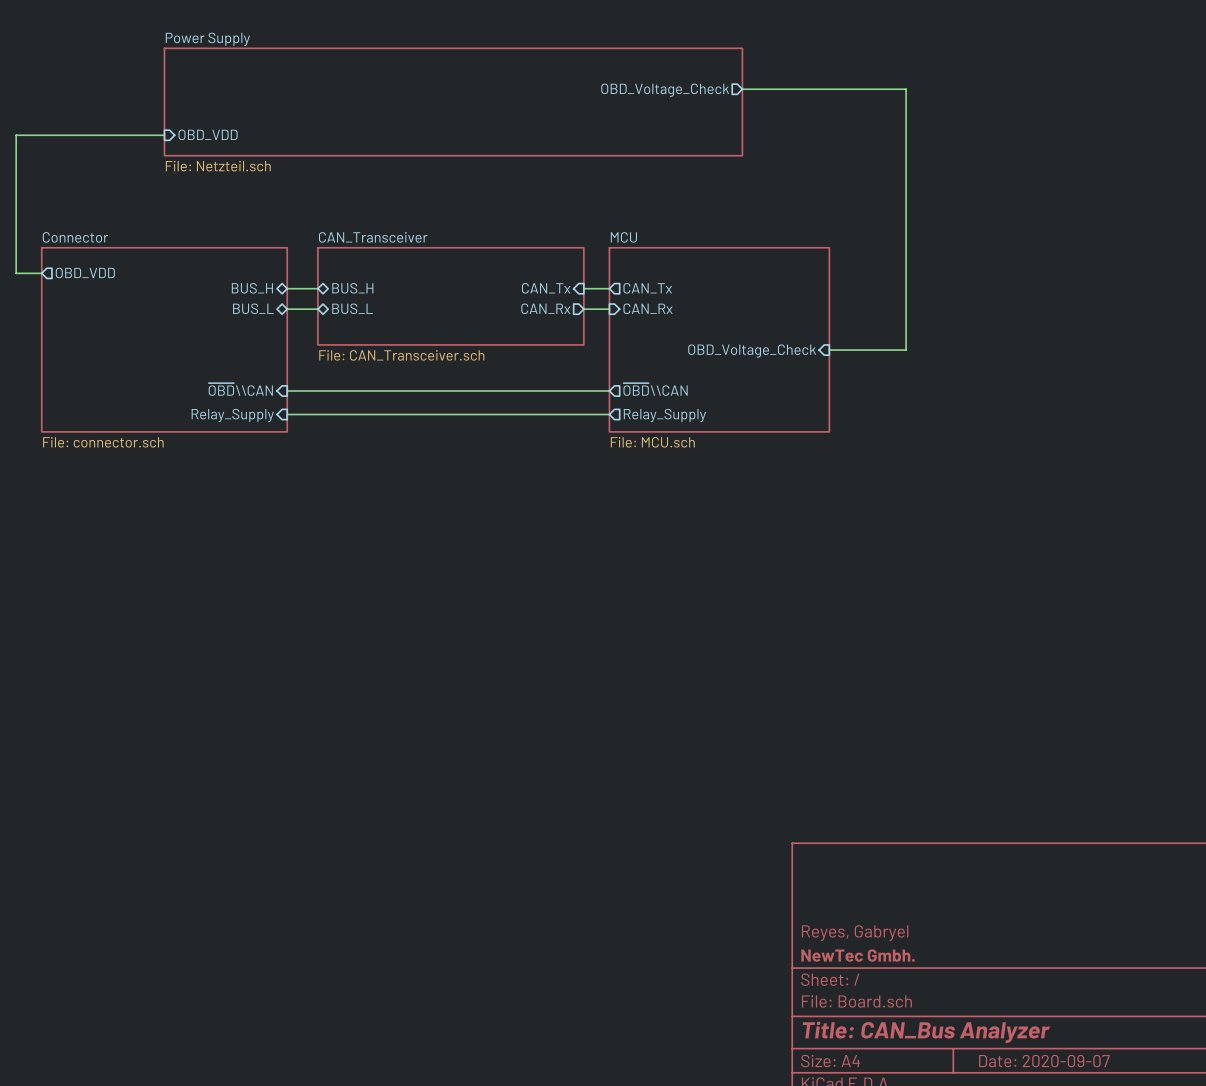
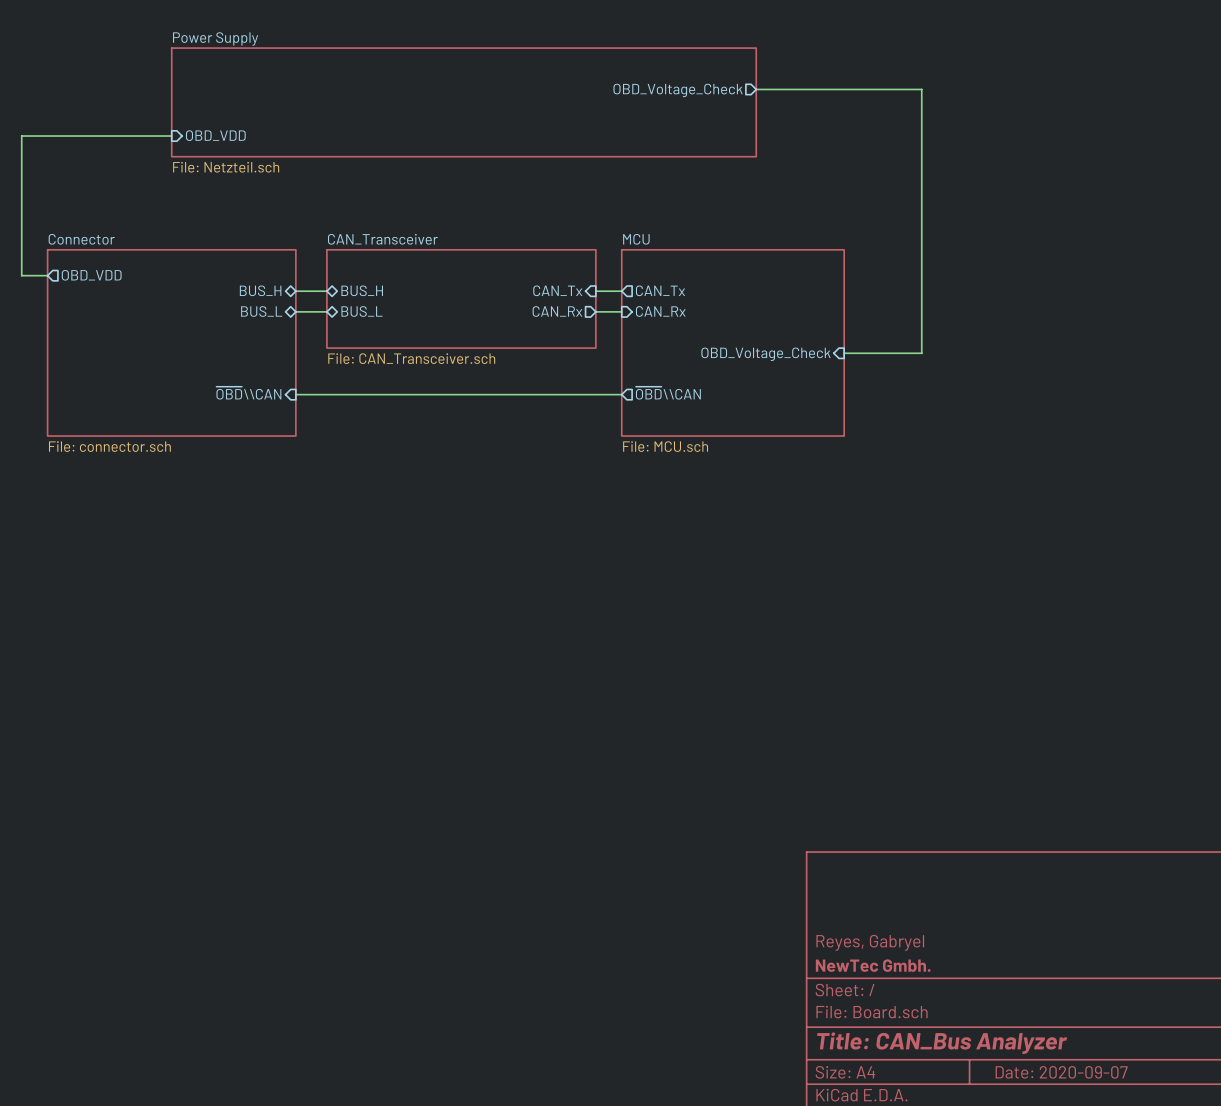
wire: (287, 414) (609, 414) -> none
sheet pin: Relay_Supply (232, 415) -> none
sheet pin: Relay_Supply (664, 415) -> none

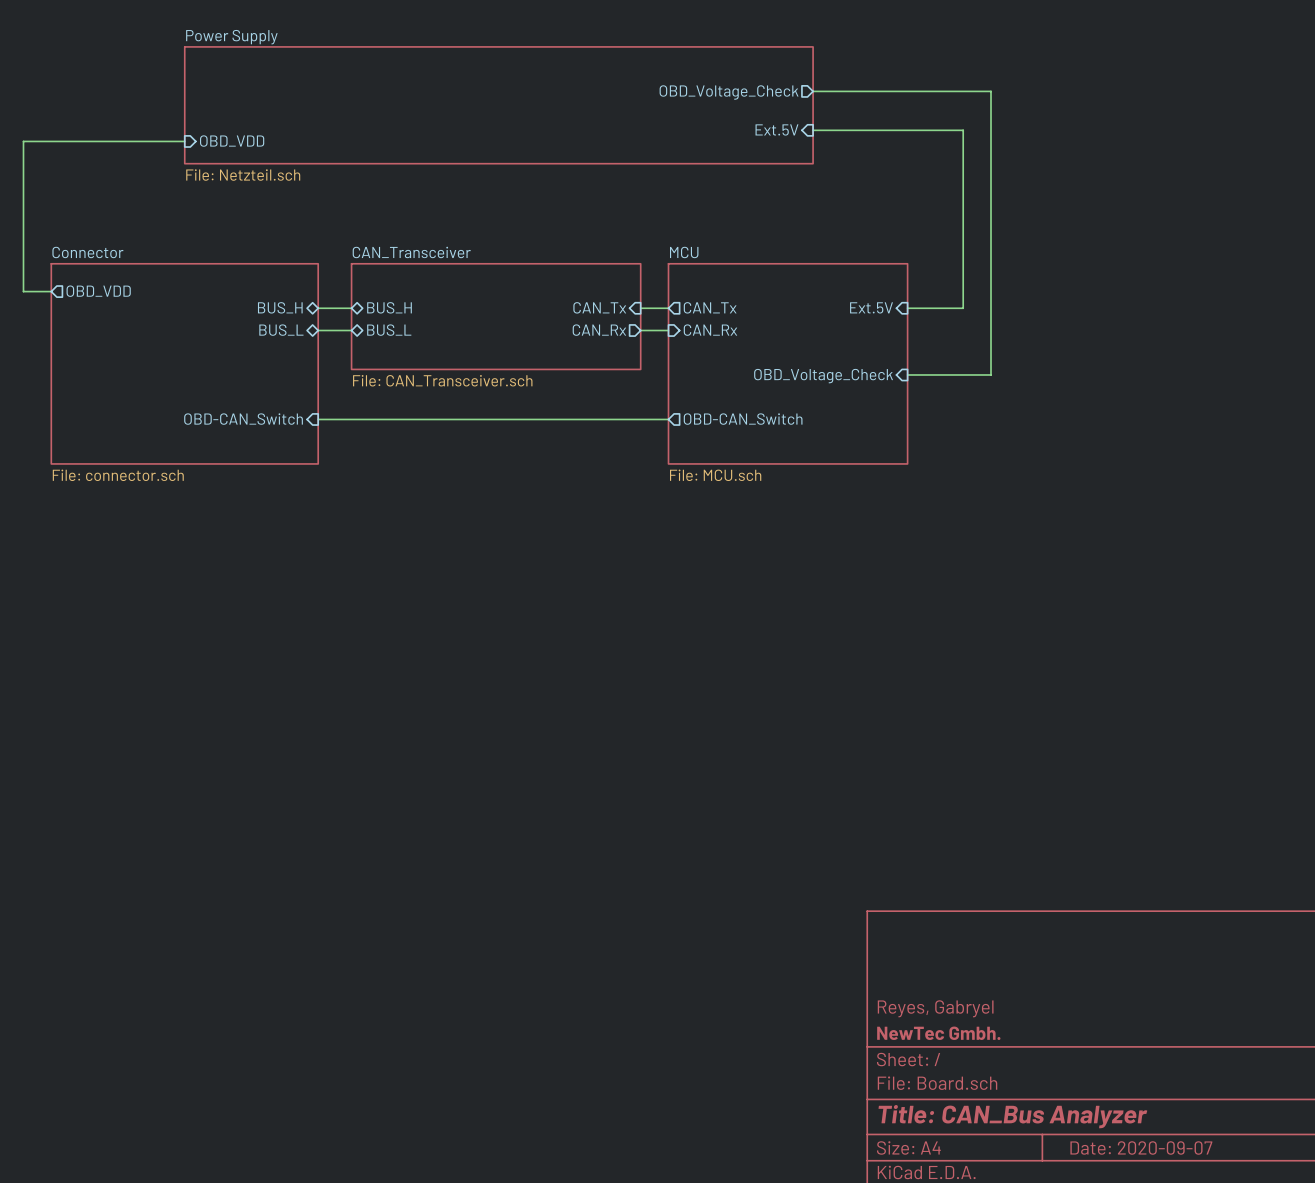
sheet pin: none -> Ext.5V (776, 129)
wire: none -> (813, 130) (963, 130) (963, 308) (907, 308)
sheet pin: none -> Ext.5V (871, 307)
sheet pin: ~{OBD}\\CAN (248, 393) -> OBD-CAN_Switch (243, 419)
sheet pin: ~{OBD}\\CAN (668, 393) -> OBD-CAN_Switch (743, 419)

